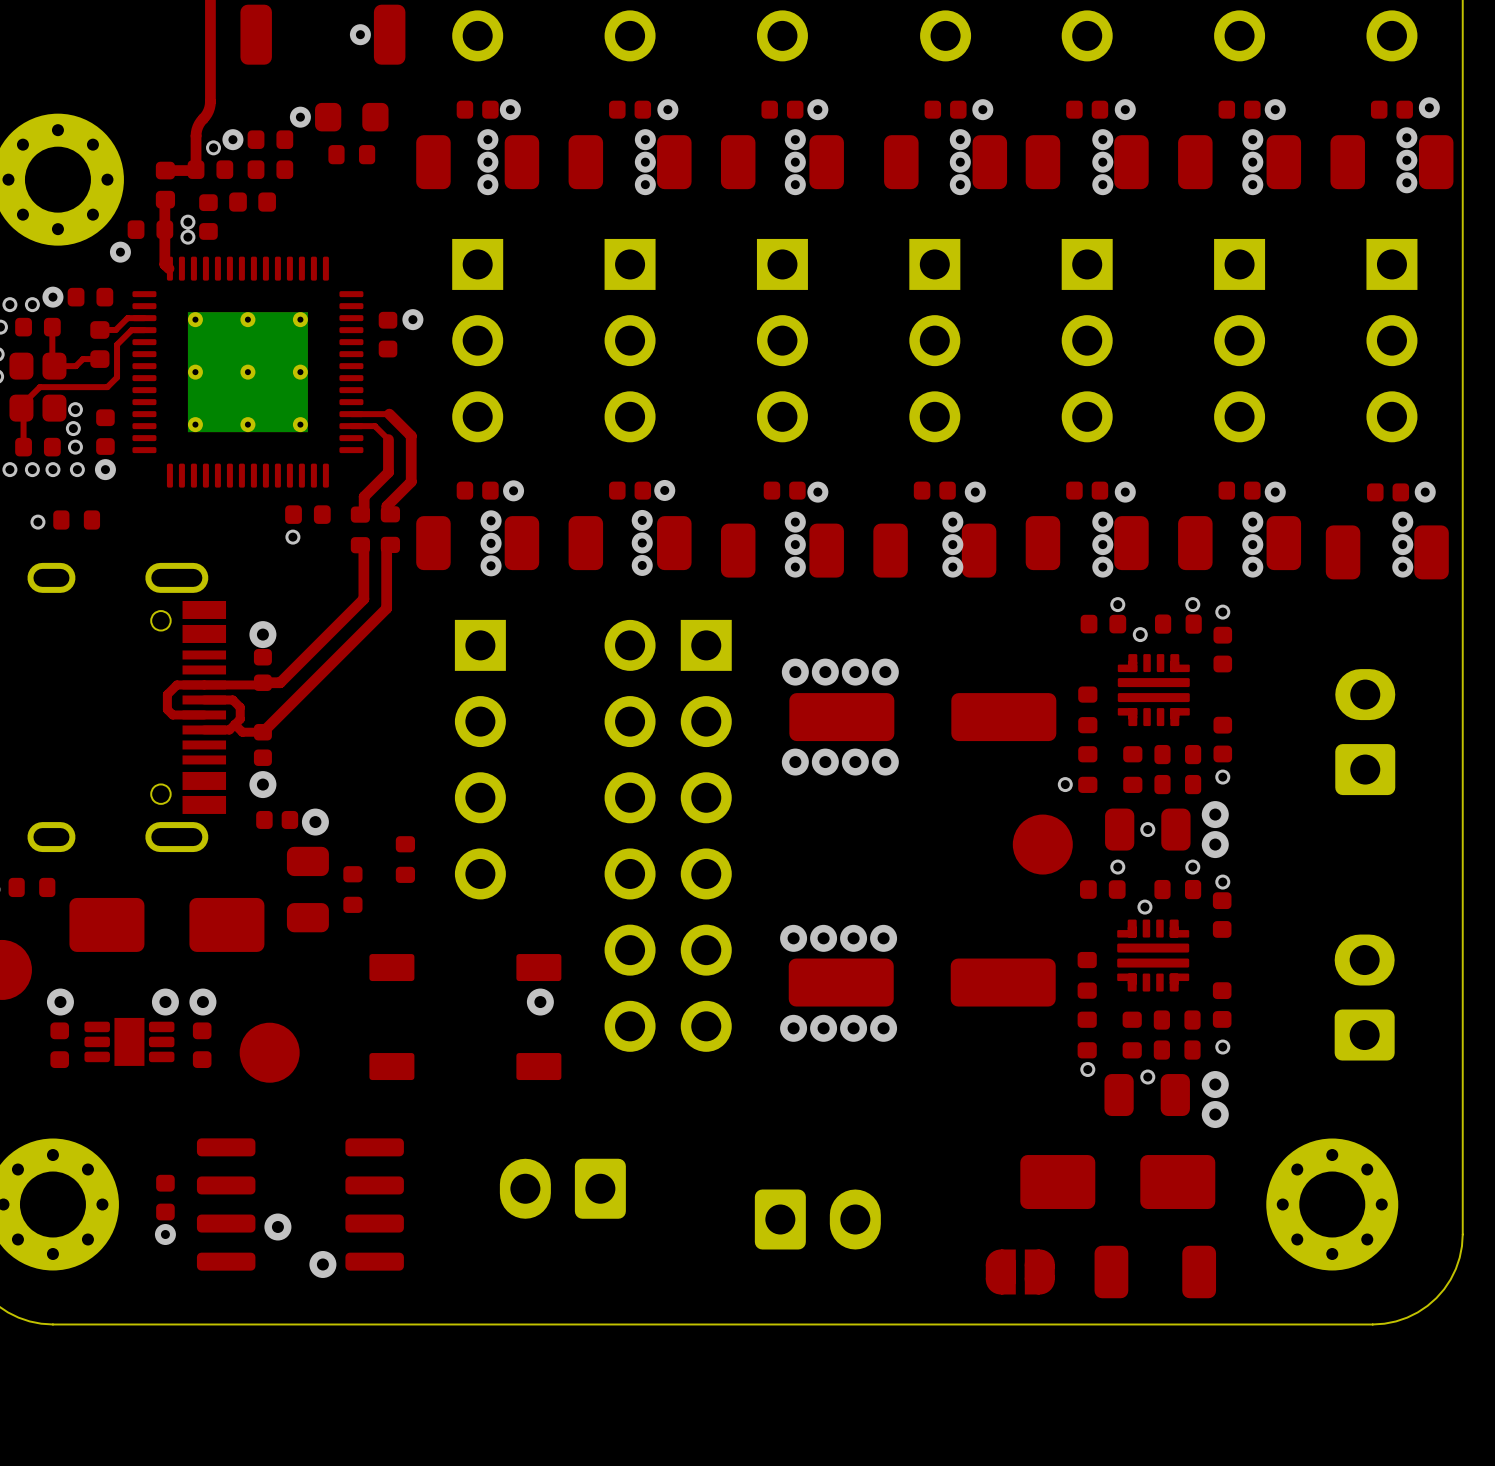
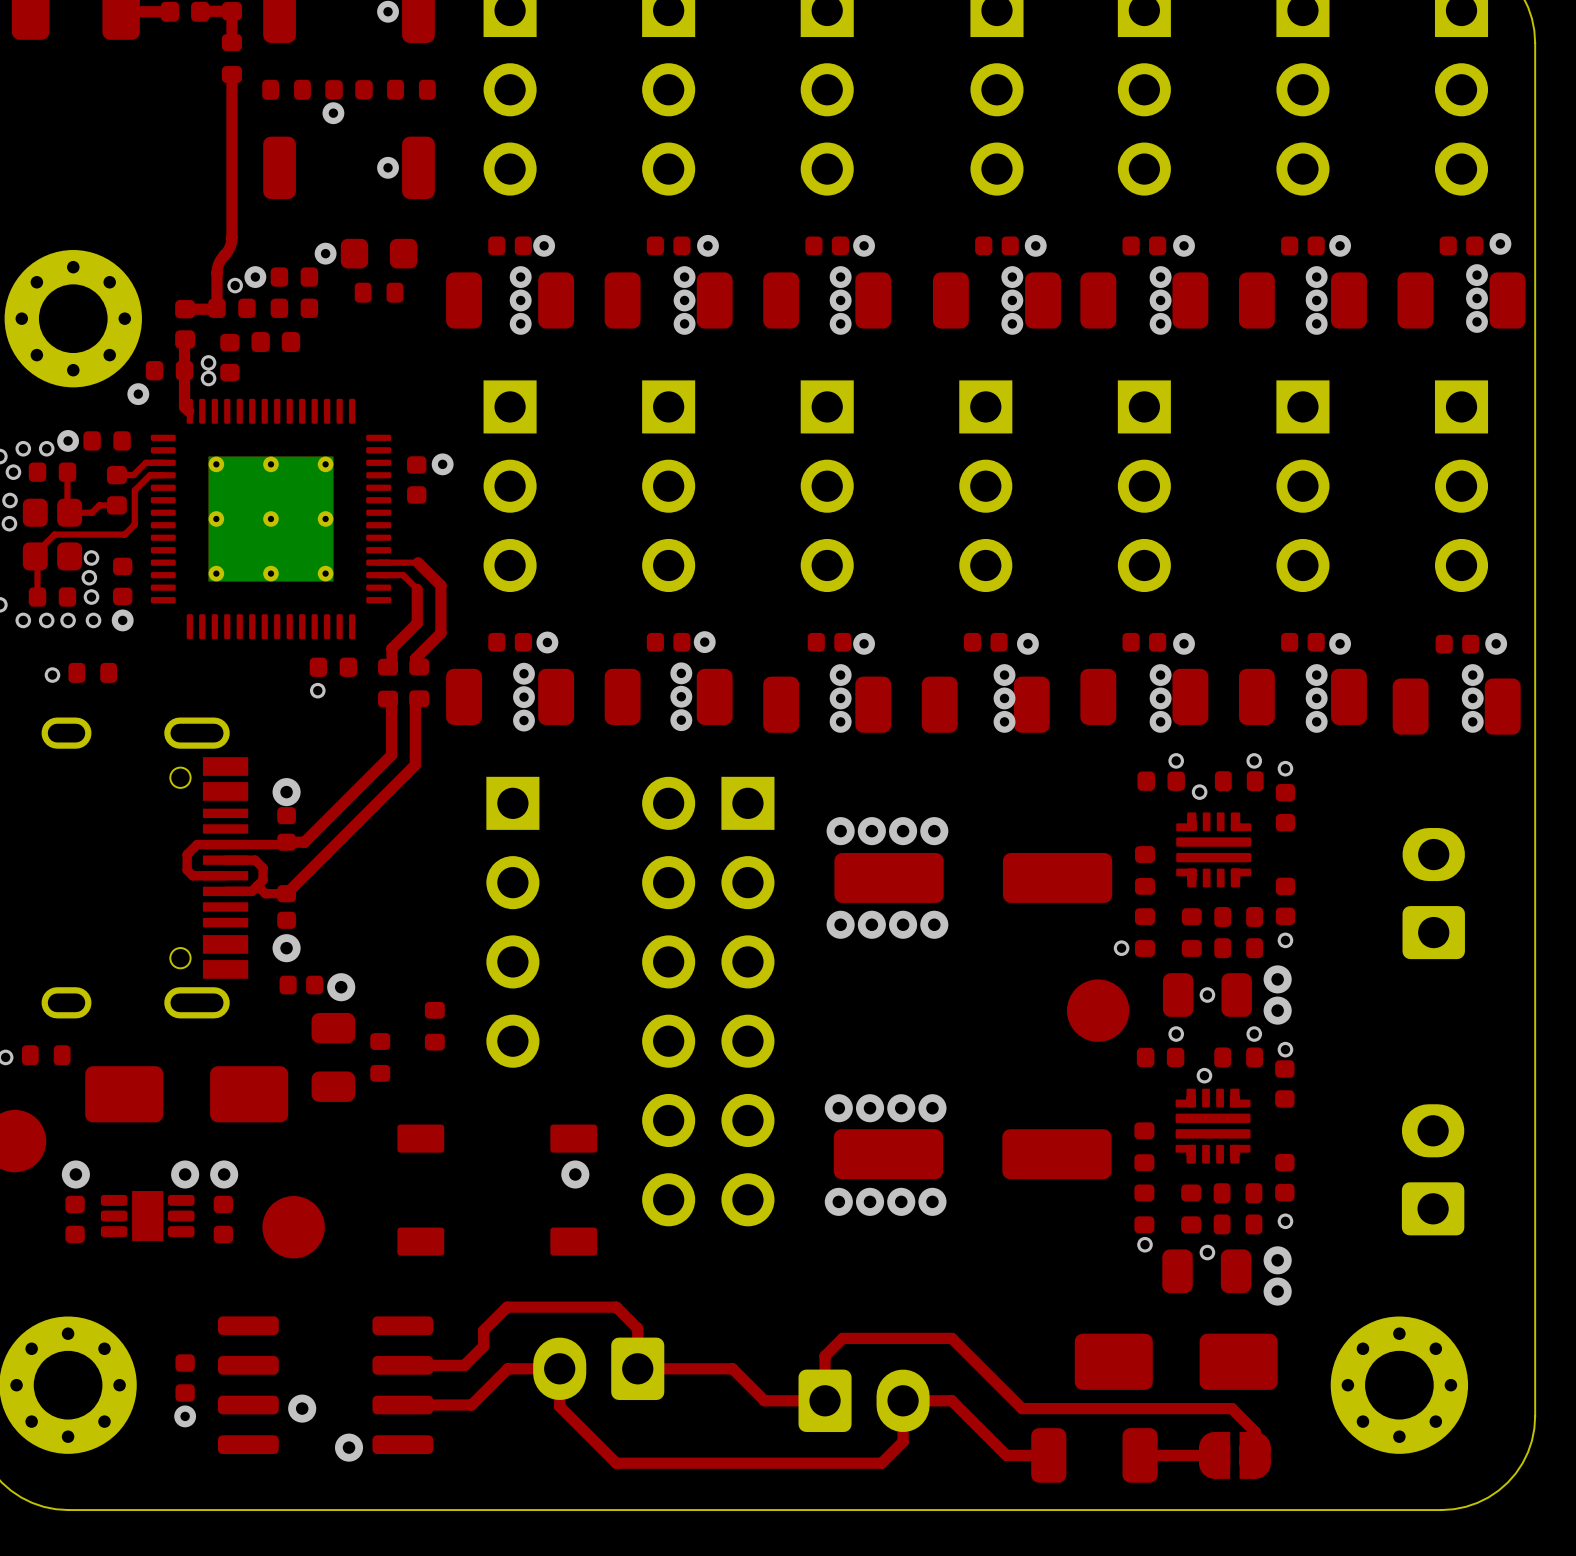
top track: none -> (402, 1365) (464, 1365) (483, 1346) (483, 1330) (507, 1307) (616, 1307) (637, 1328) (637, 1368) (732, 1368) (764, 1400) (825, 1400) (825, 1356) (842, 1338) (951, 1338) (1022, 1408) (1231, 1408) (1255, 1431) (1255, 1455)
top track: none -> (402, 1405) (471, 1405) (507, 1368) (559, 1368) (559, 1406) (616, 1463) (881, 1463) (903, 1441) (903, 1400) (951, 1400) (1006, 1455) (1048, 1455)
part footprint: [1094, 1245, 1217, 1299] -> [1198, 1432, 1271, 1479]
part footprint: [985, 1249, 1055, 1295] -> [1031, 1428, 1158, 1483]
top track: none -> (1214, 1455) (1140, 1455)

